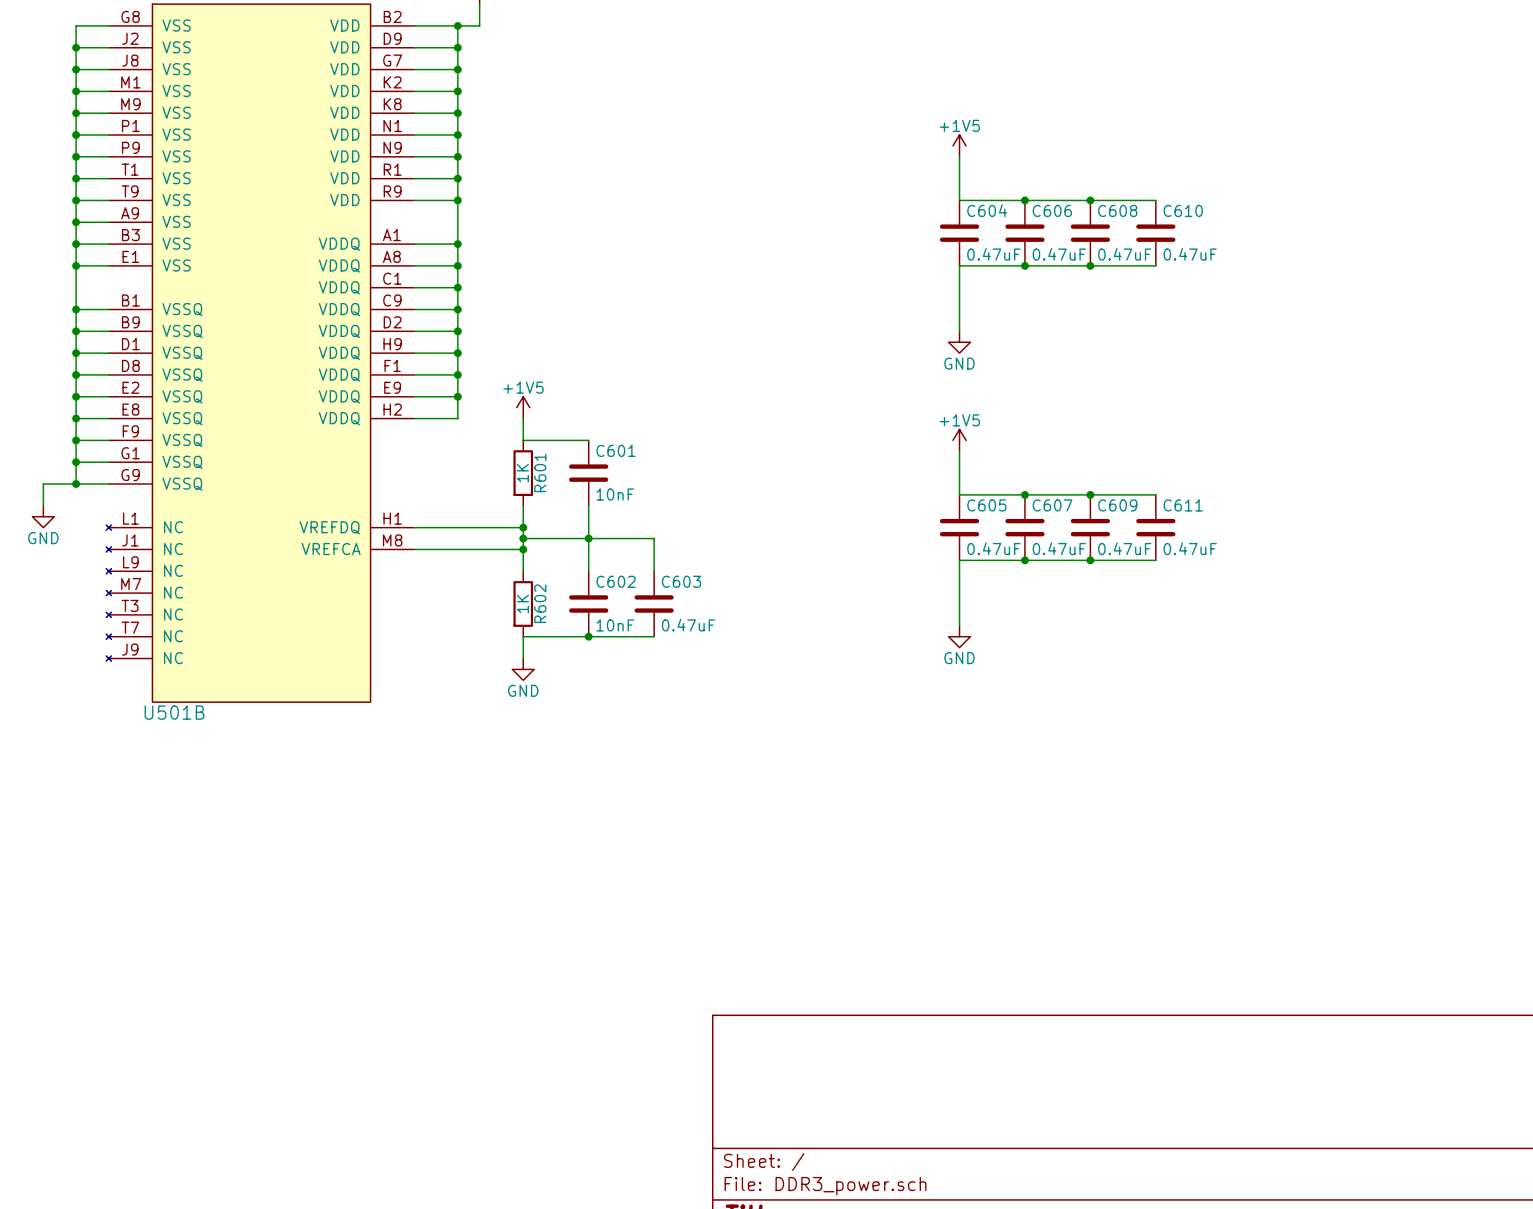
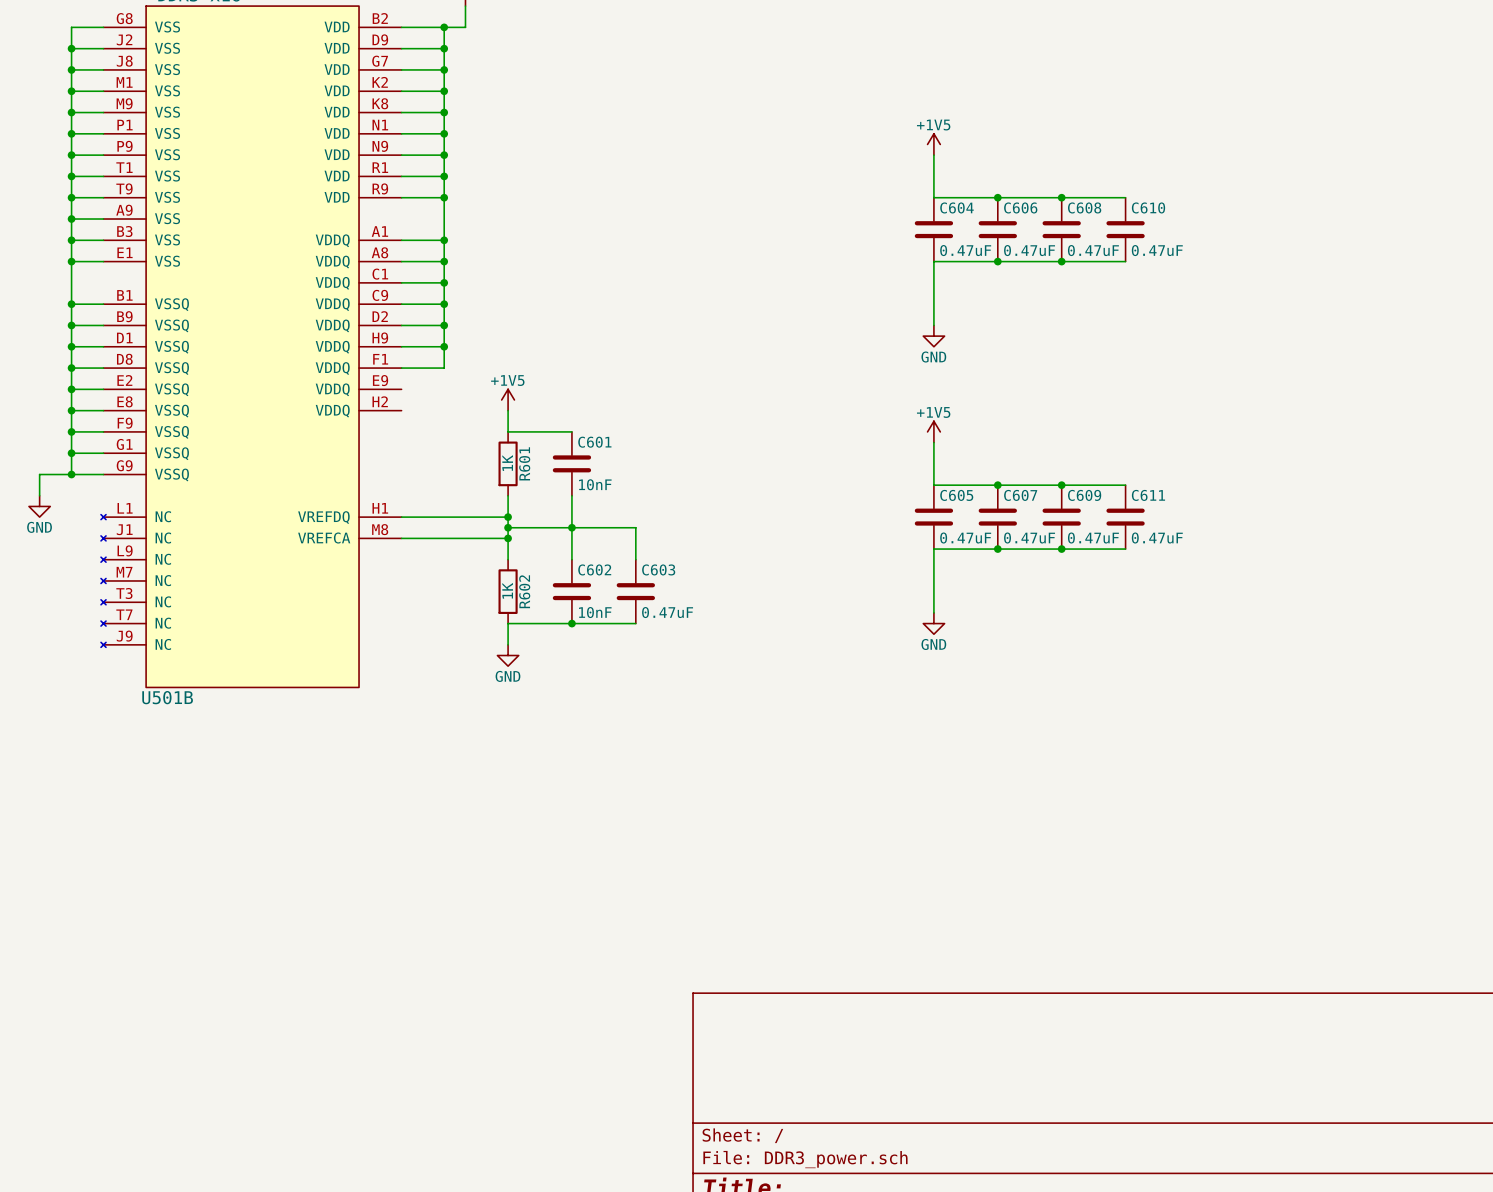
wire: (457, 374) (457, 418) (414, 418) -> none
junction: (457, 374) -> none
wire: (414, 396) (457, 396) -> none
junction: (457, 396) -> none

